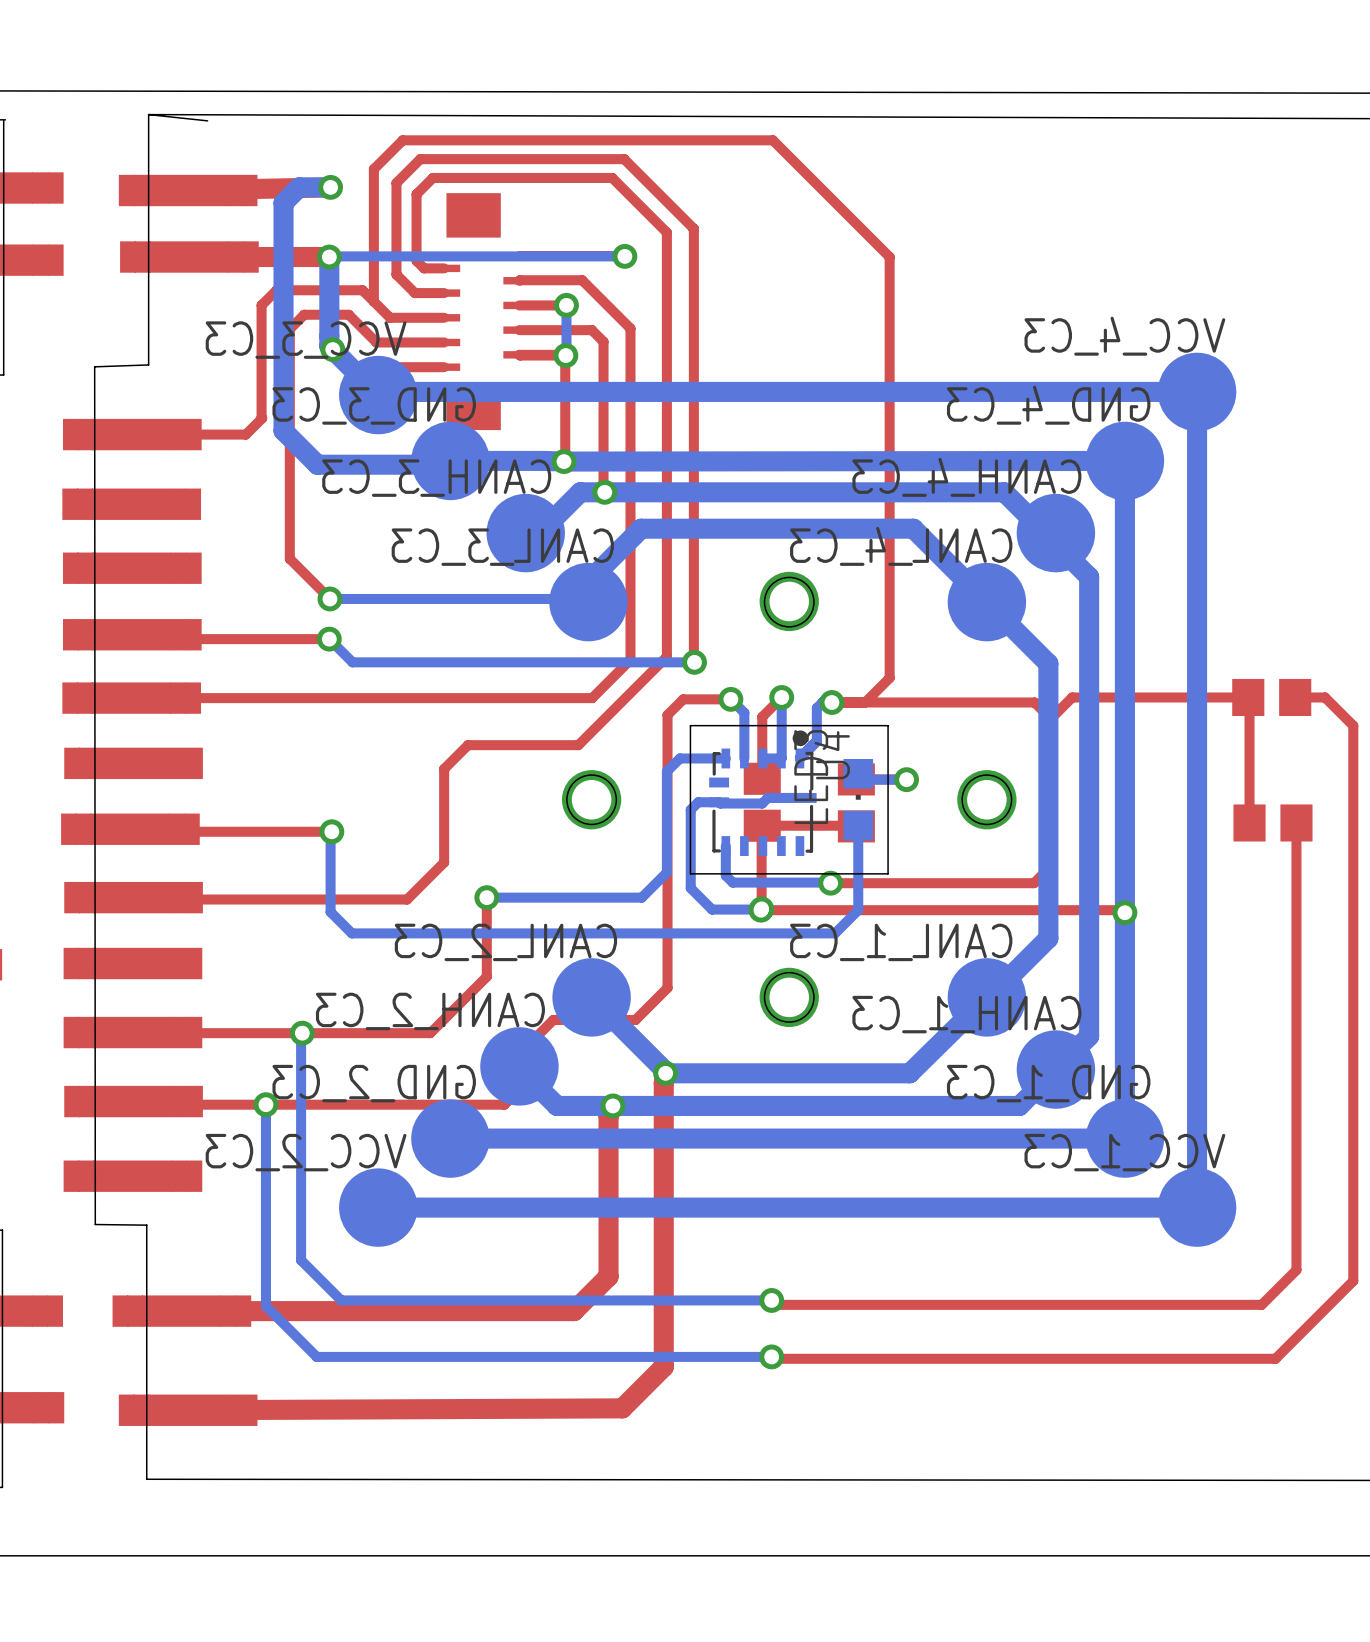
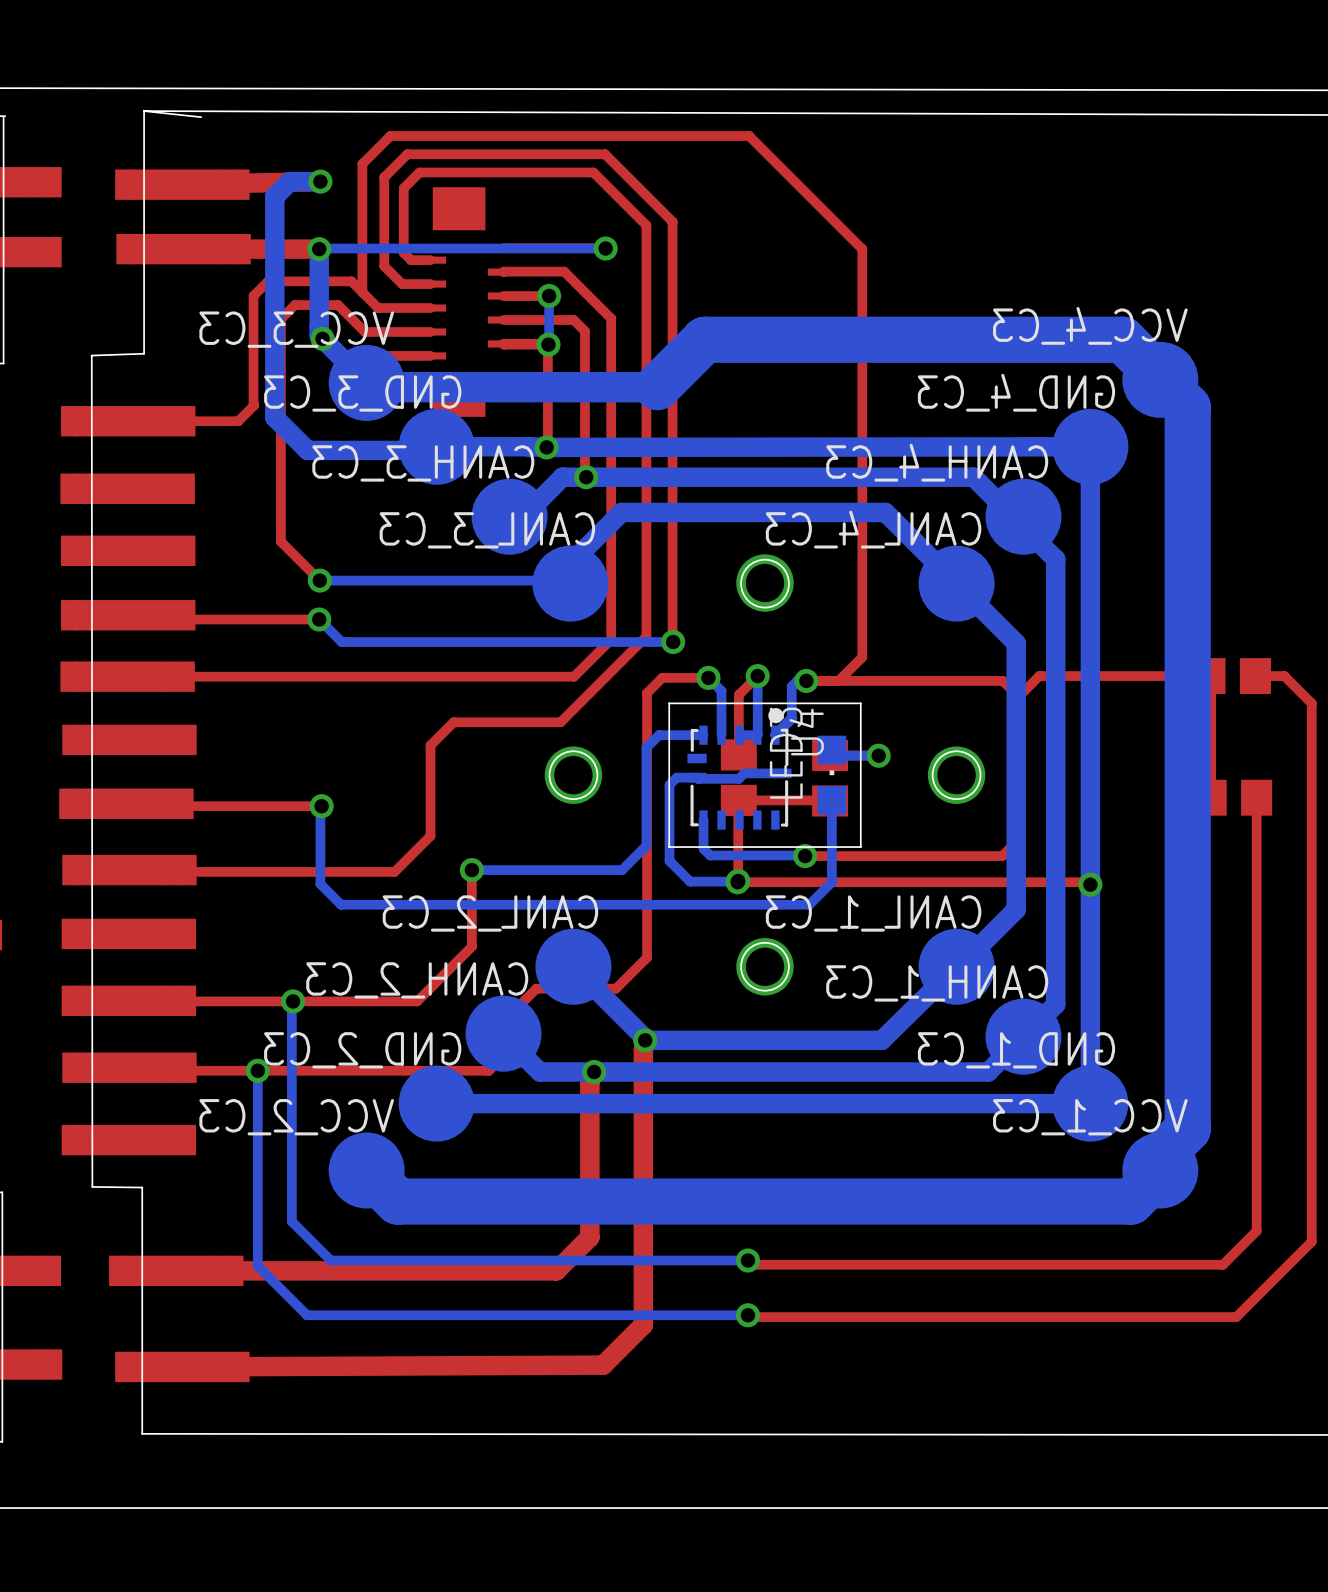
bottom track: (381, 391) (1197, 391) (1197, 1193) -> (358, 374) (370, 387) (657, 387) (704, 339) (1122, 339) (1187, 407) (1187, 1129) (1160, 1156)
bottom track: (1197, 1207) (378, 1207) -> (1160, 1170) (1131, 1201) (397, 1201) (366, 1170)

